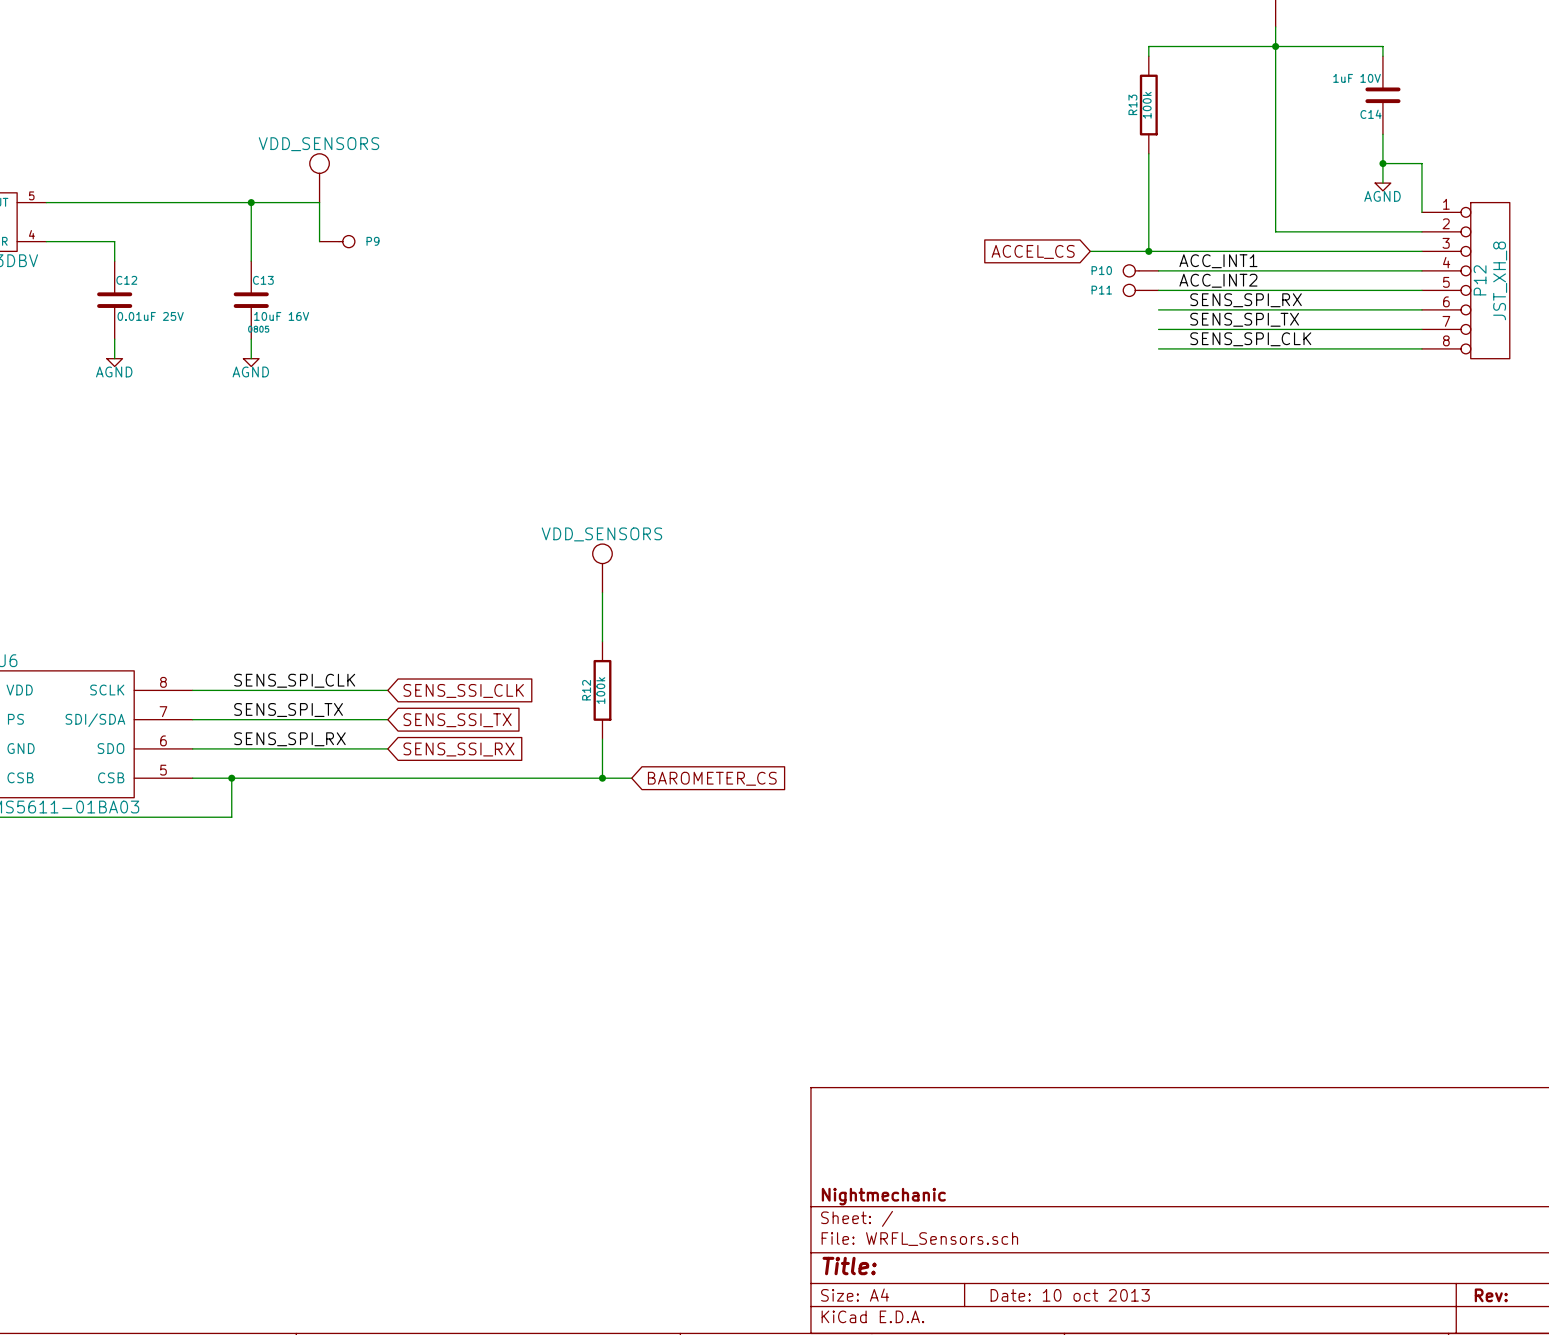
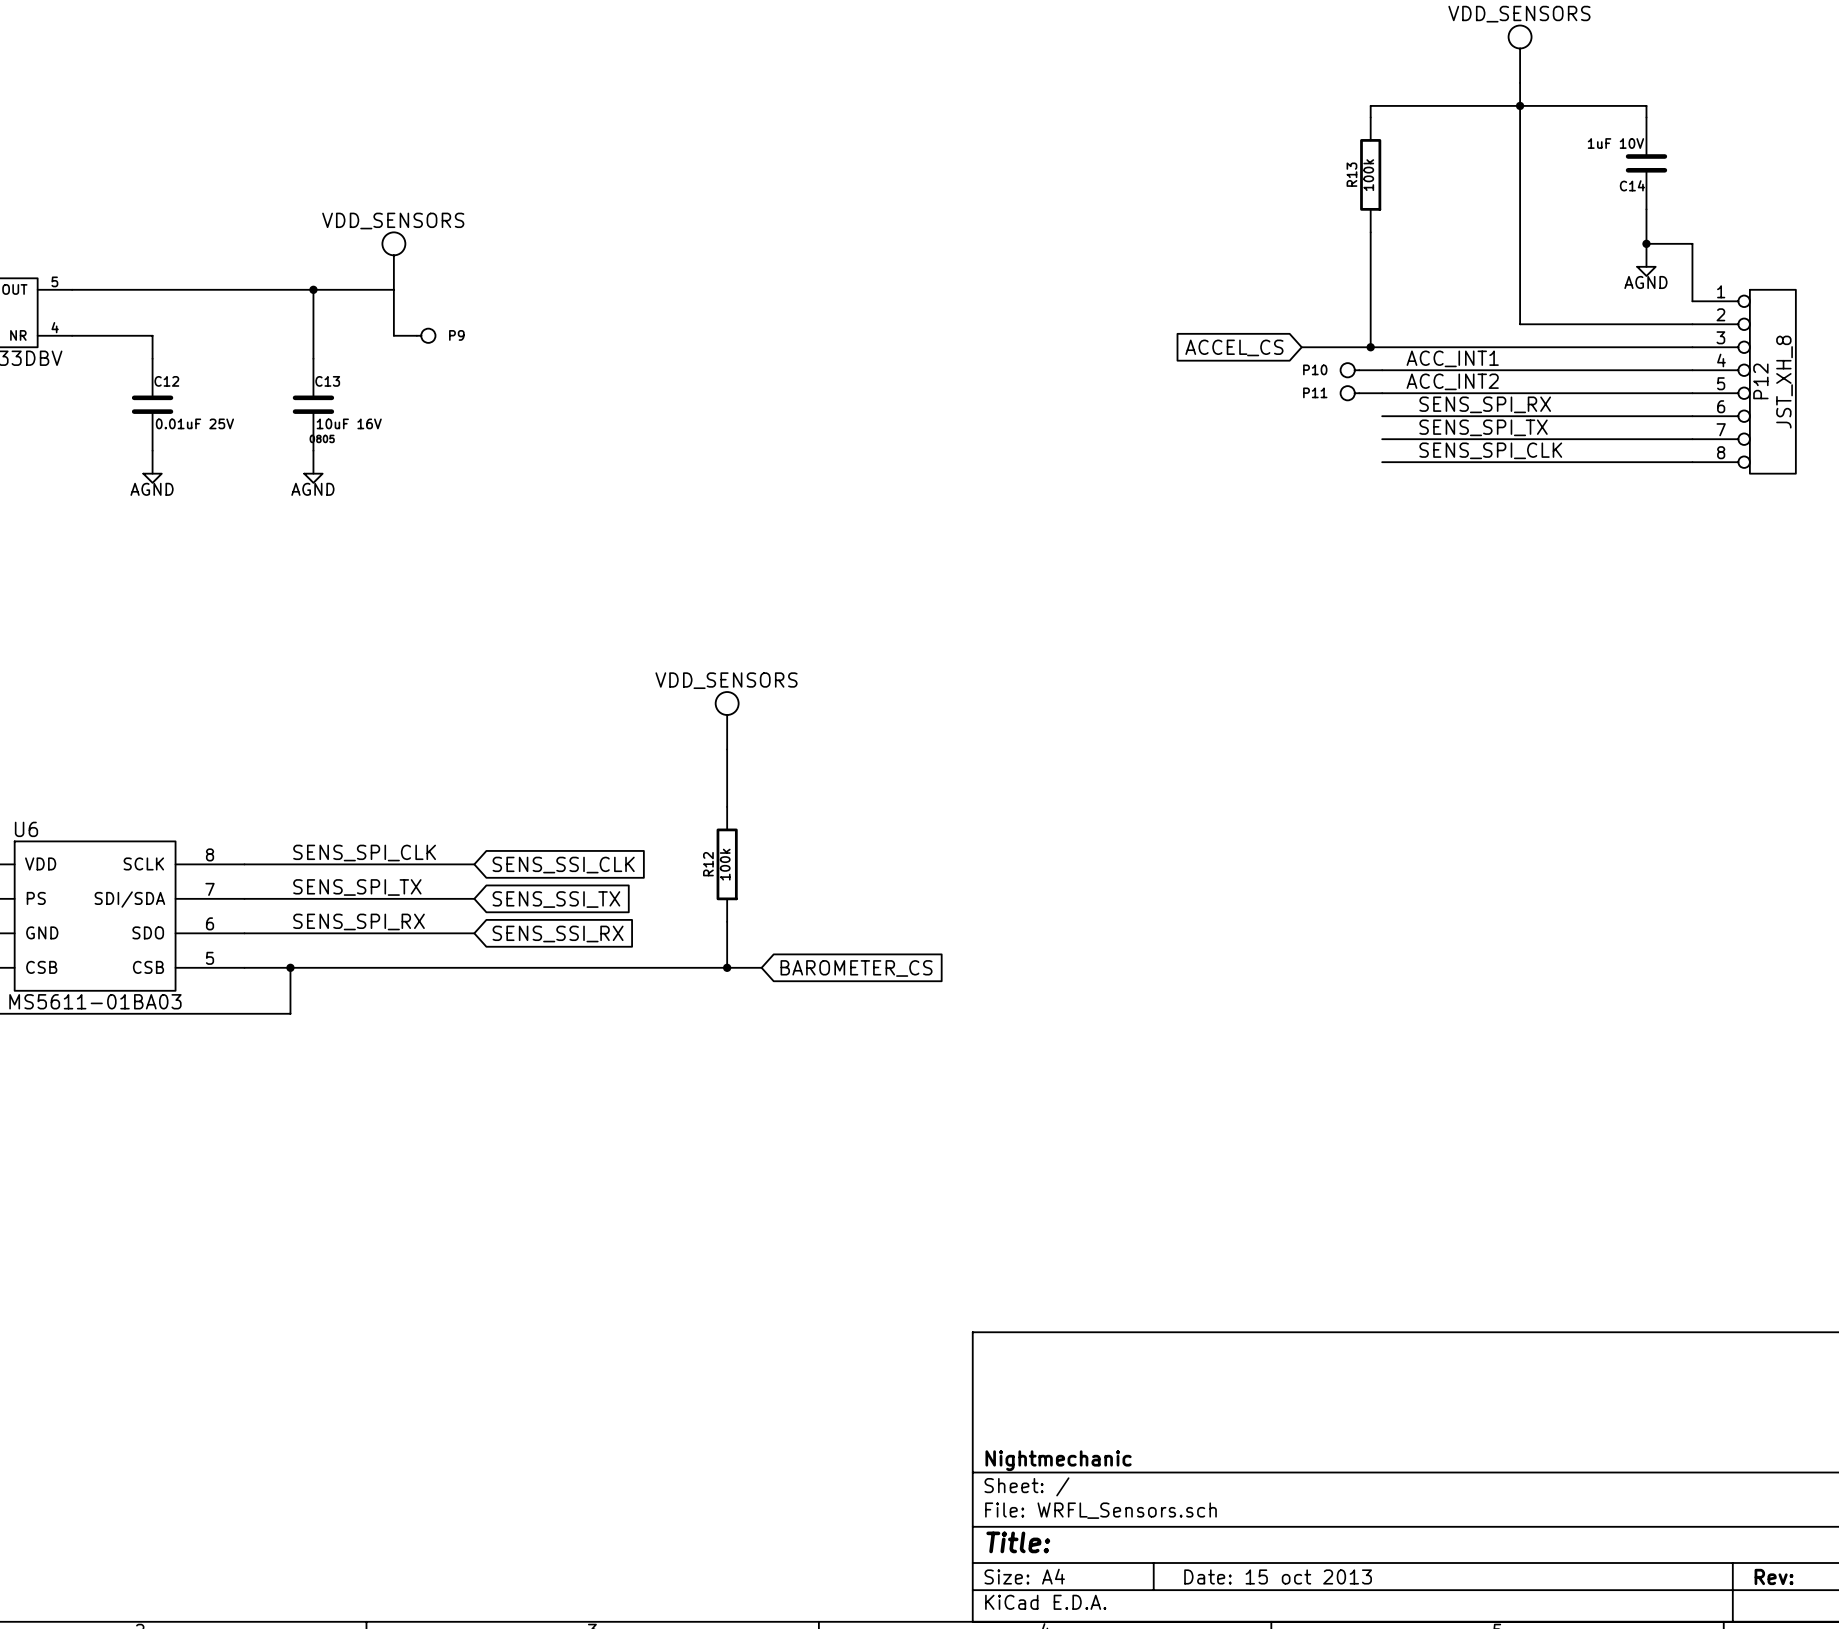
title block: Date: 10 oct 2013 (1070, 1295) -> Date: 15 oct 2013 (1278, 1576)

